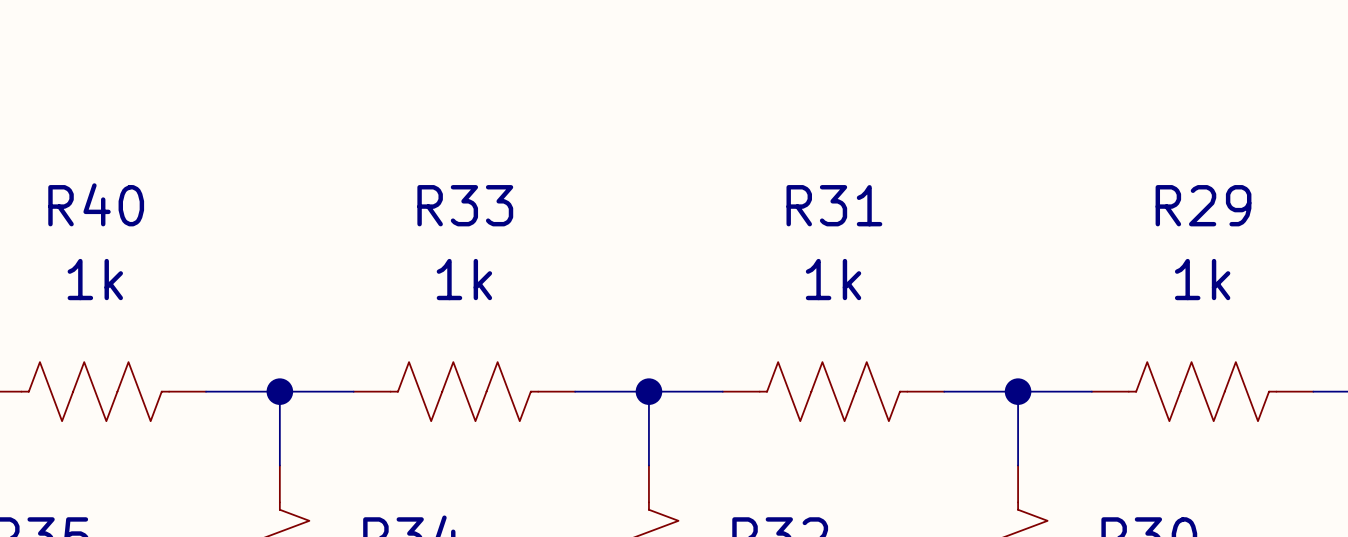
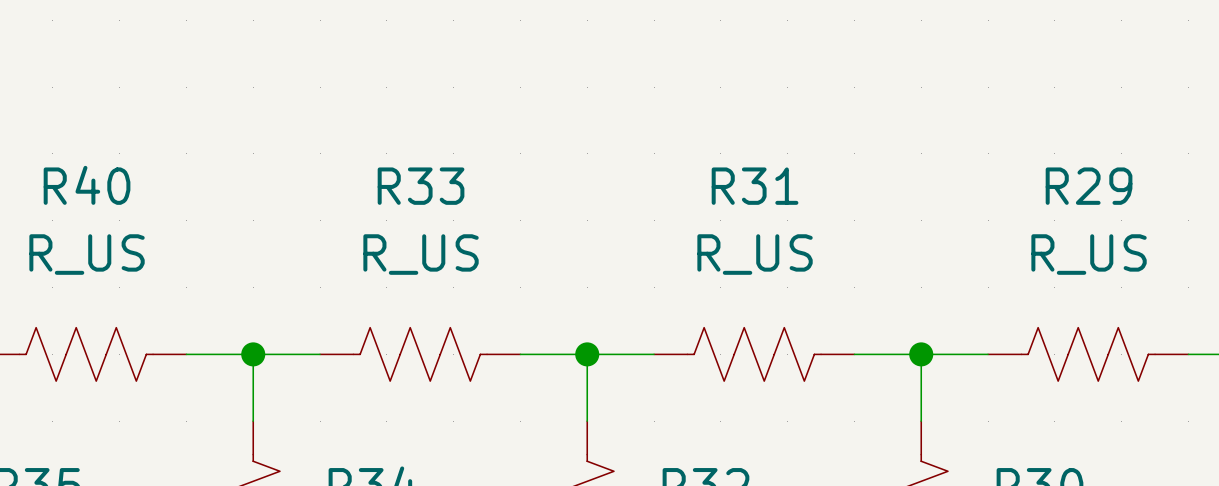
R40 value: 1k (95, 279) -> R_US (87, 254)
R33 value: 1k (464, 279) -> R_US (421, 254)
R31 value: 1k (833, 279) -> R_US (755, 254)
R29 value: 1k (1202, 279) -> R_US (1089, 254)

